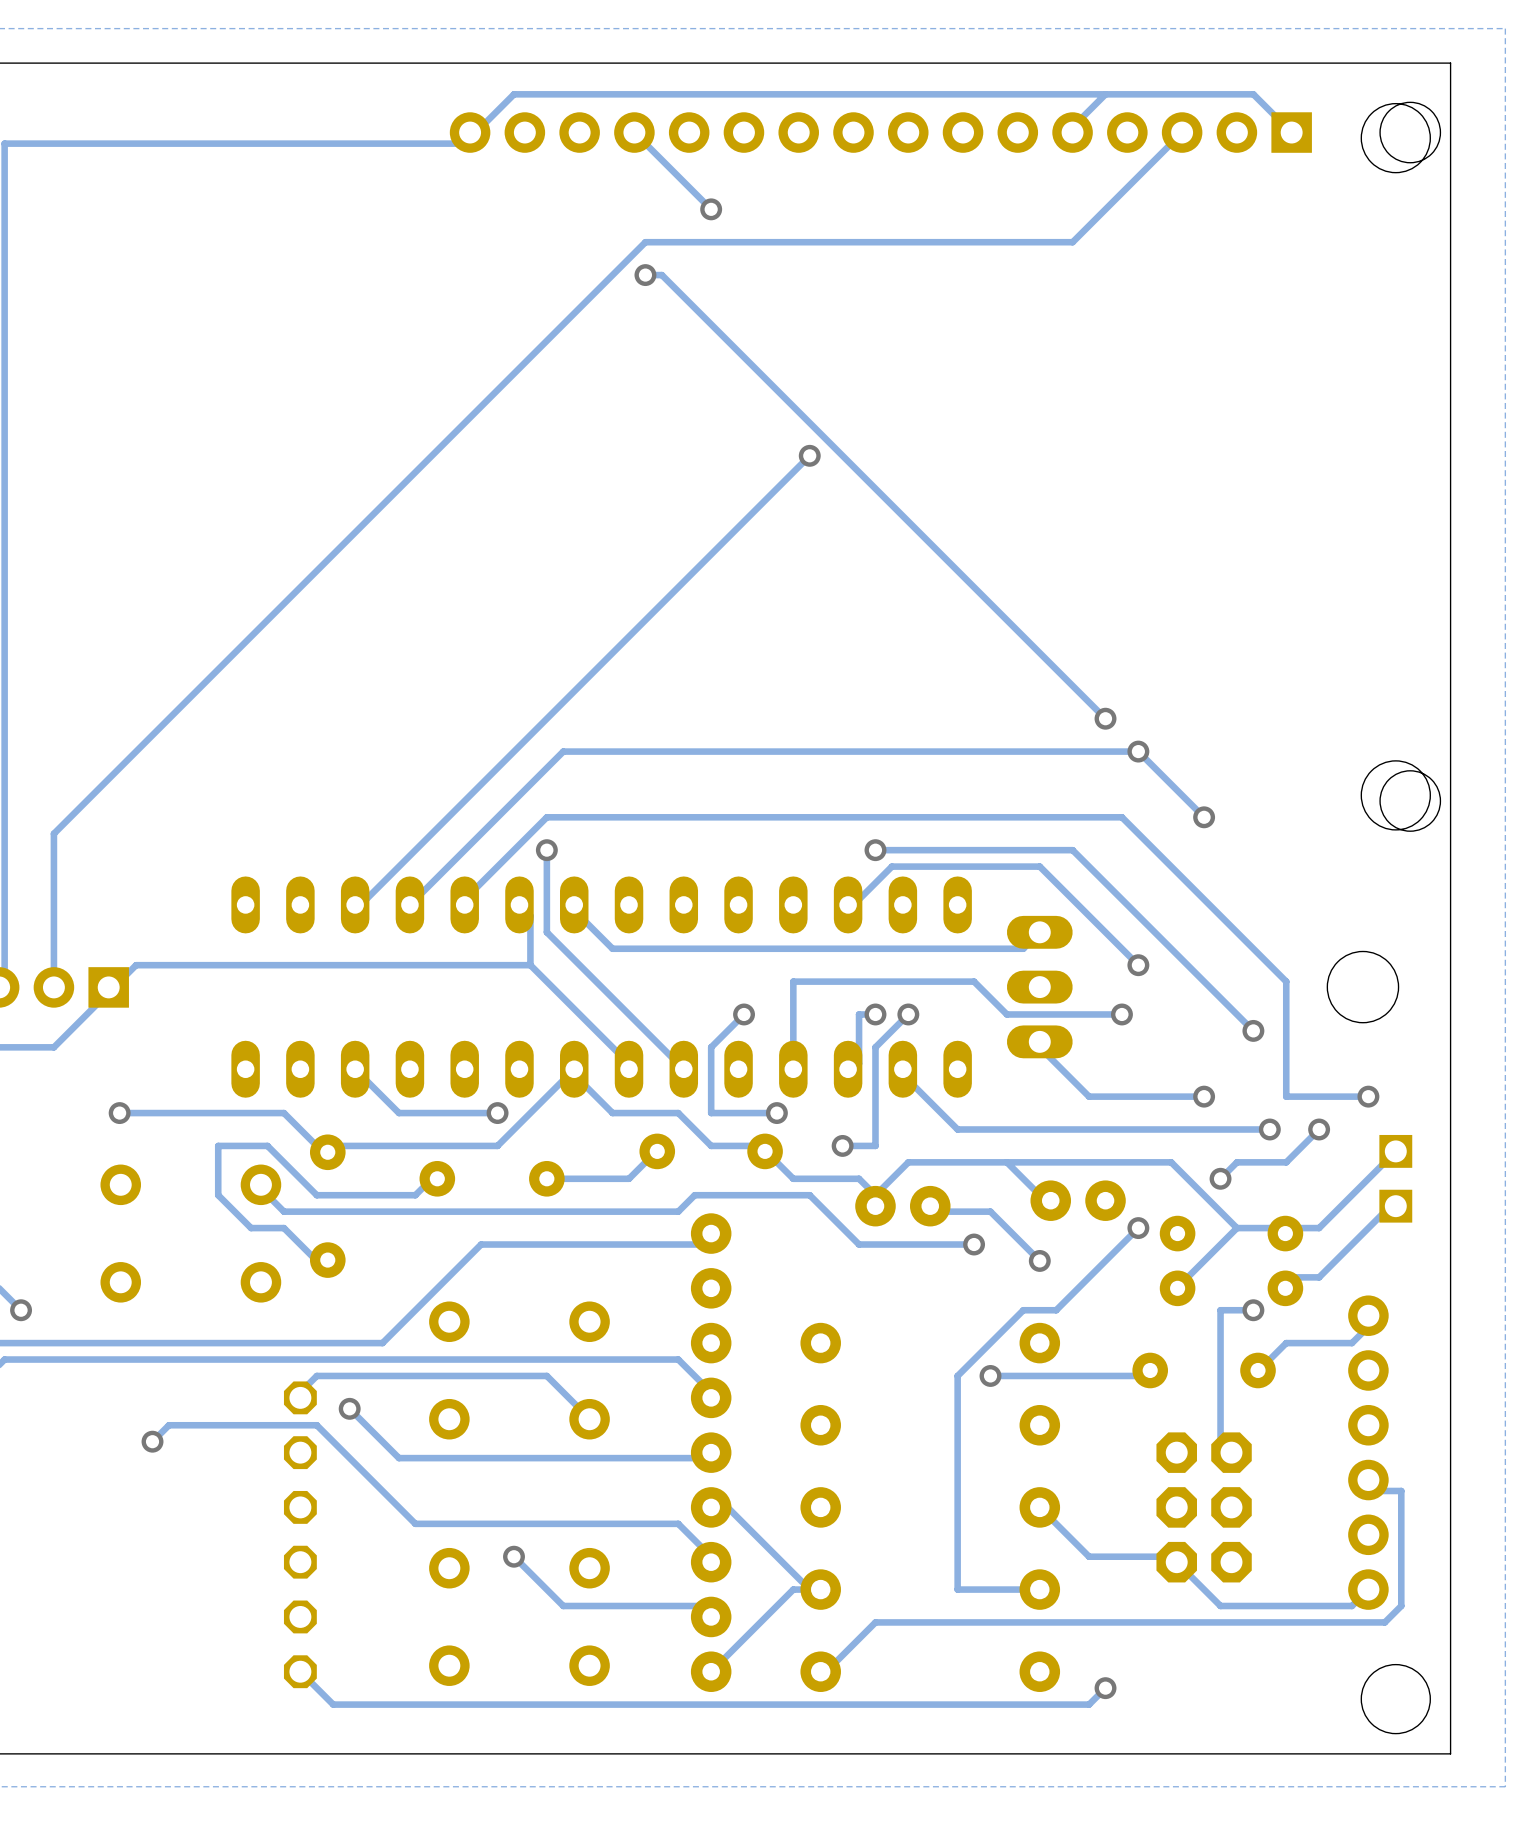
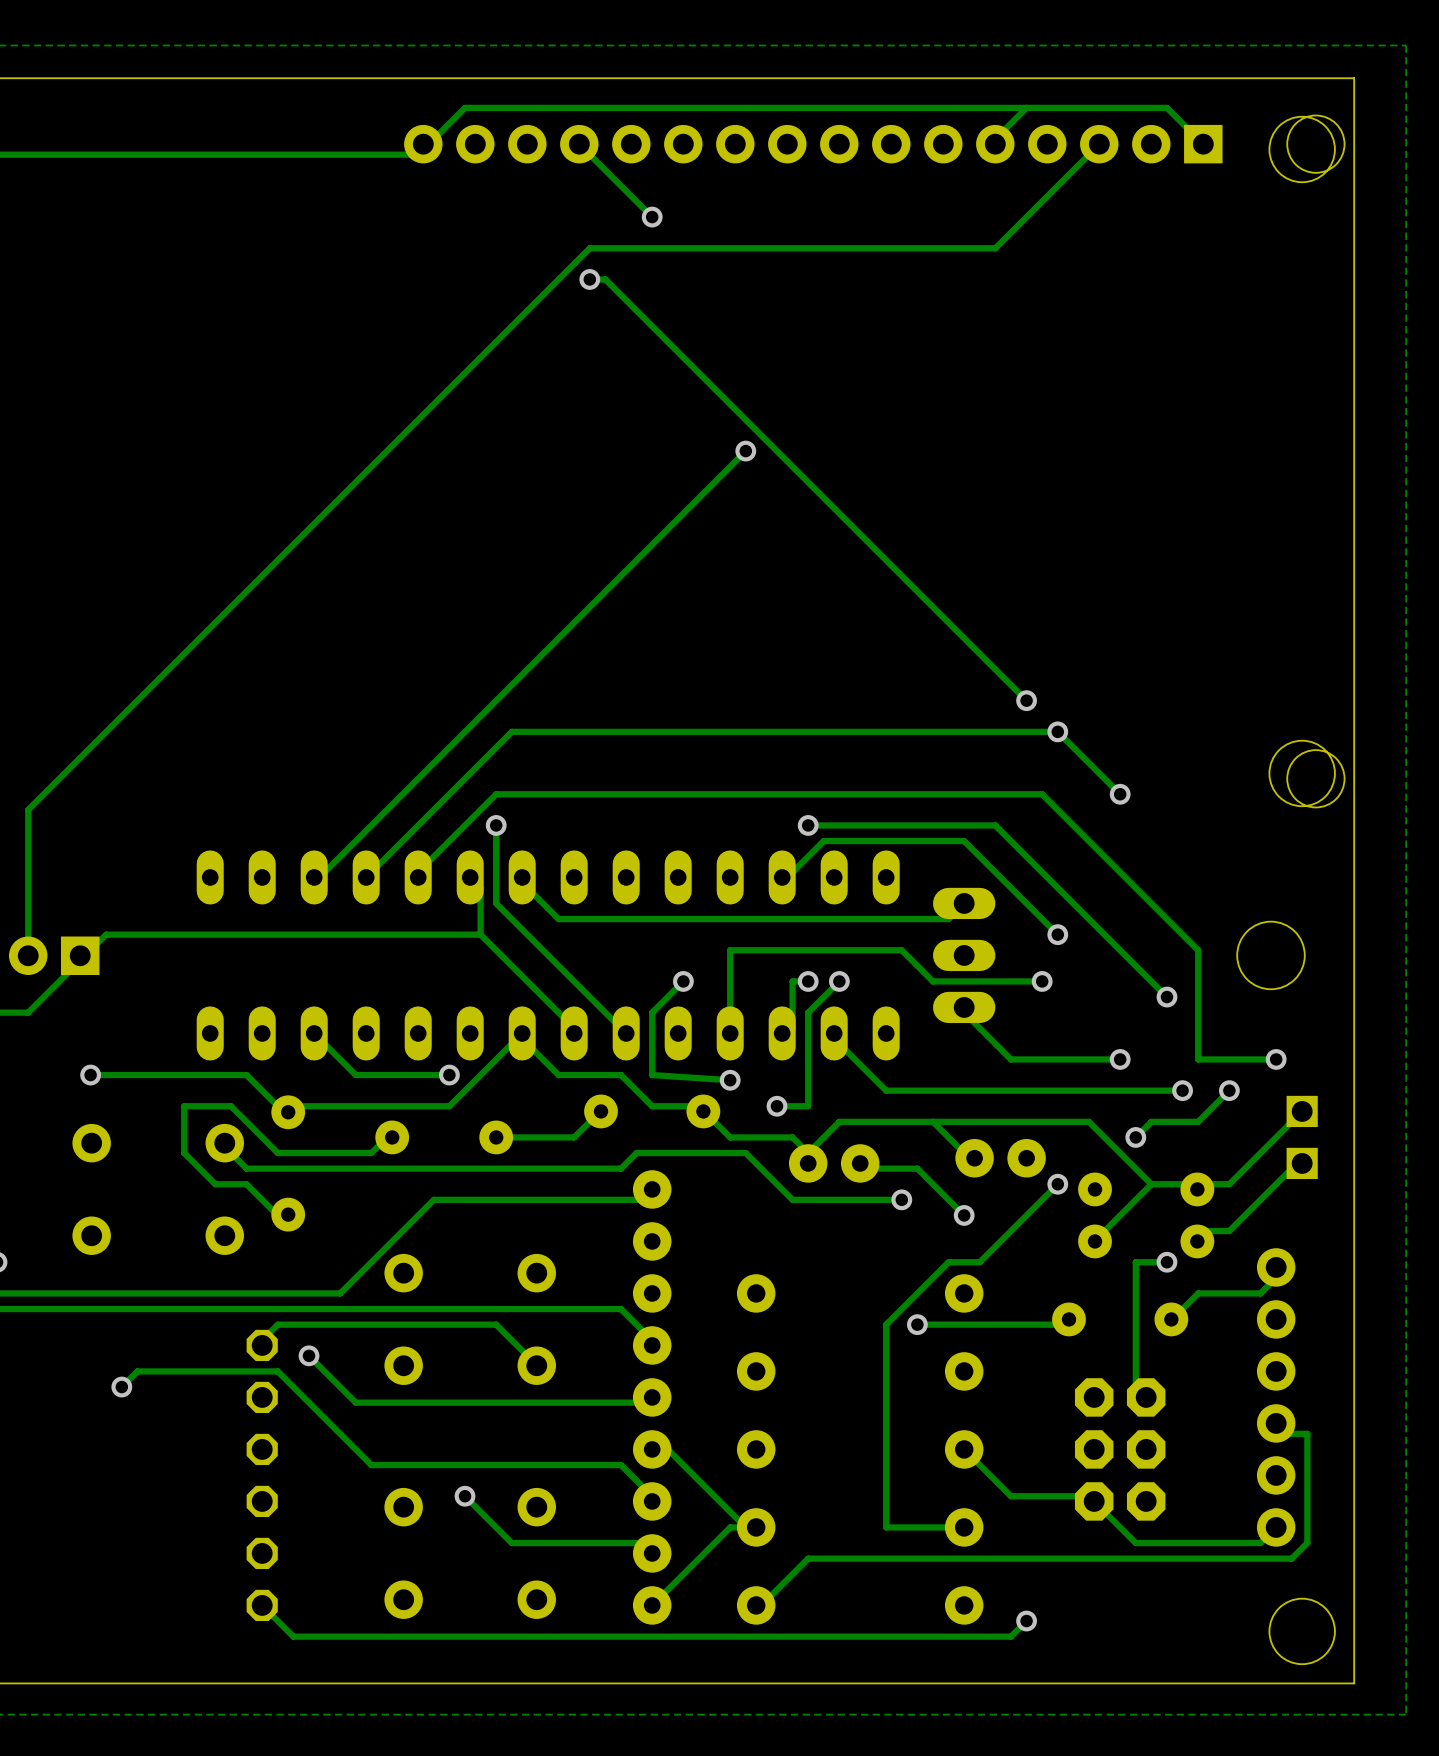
track: (776, 1113) (711, 1113) -> (730, 1080) (652, 1075)
via position: (776, 1113) -> (730, 1080)

